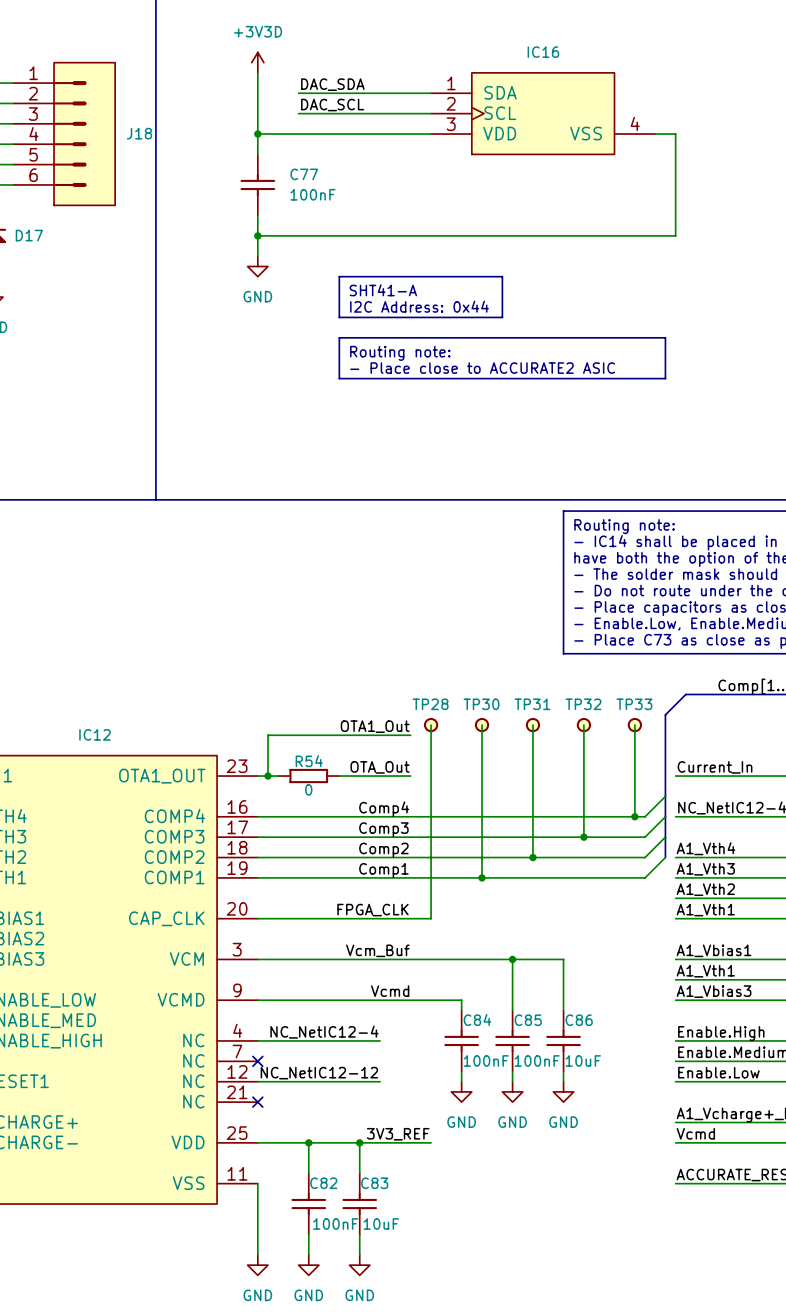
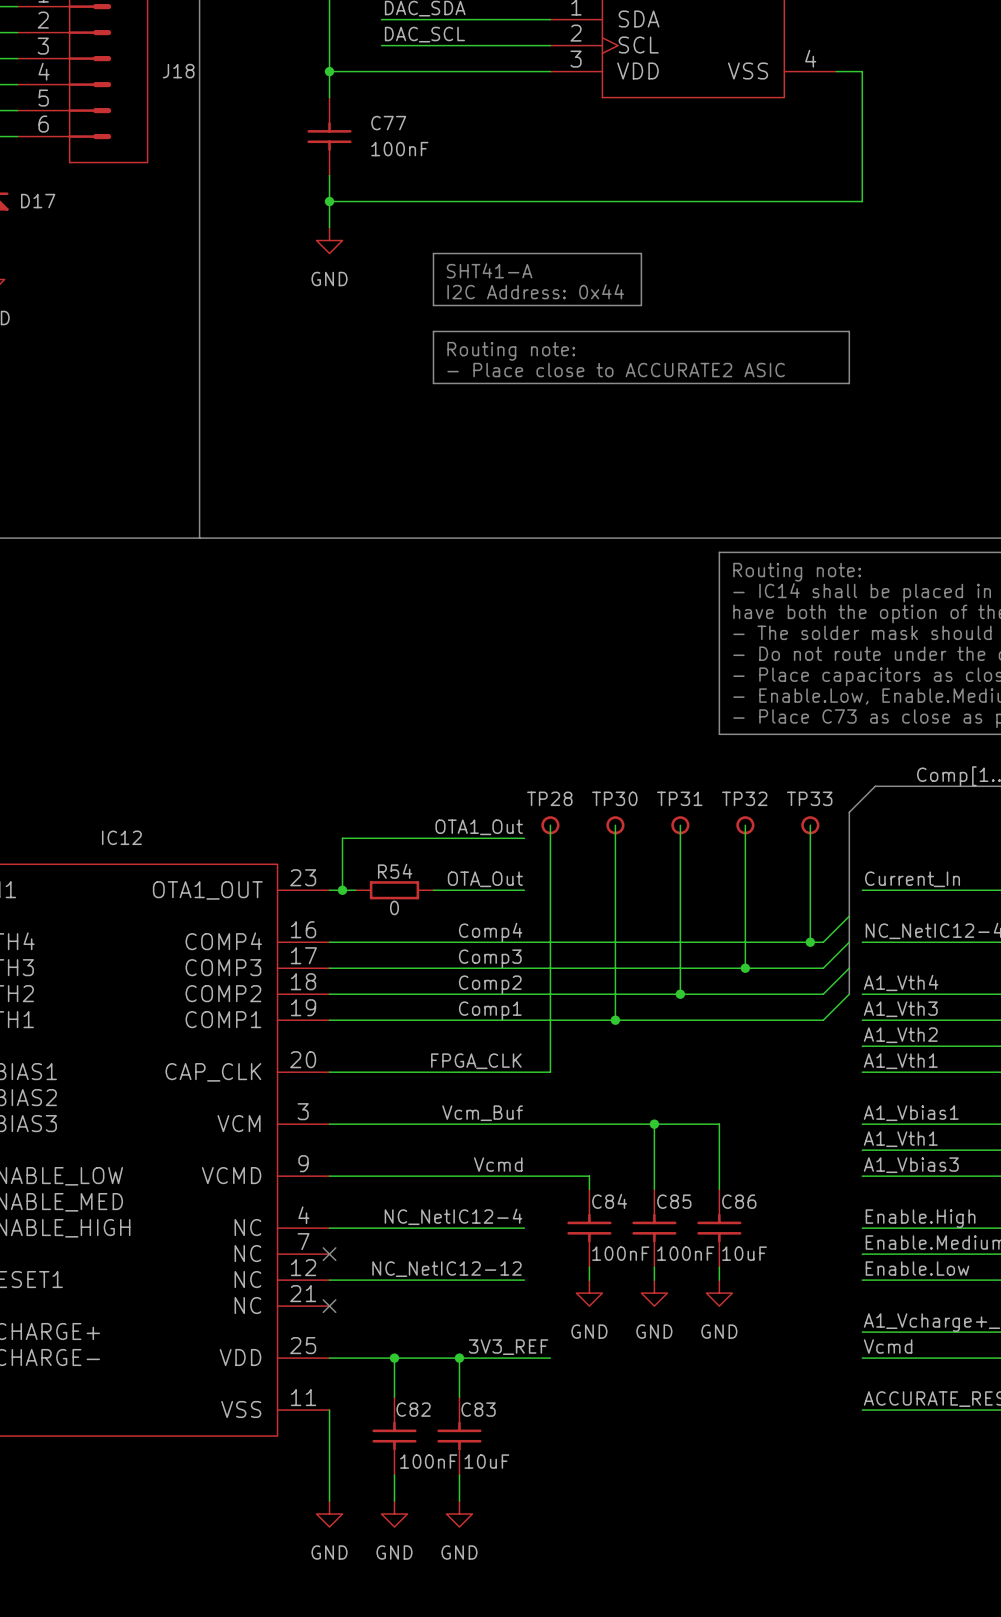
label position: NC_NetIC12-4 (324, 1032) -> NC_NetIC12-4 (453, 1216)
wire: none -> (485, 1228) (524, 1228)
label position: NC_NetIC12-12 (319, 1073) -> NC_NetIC12-12 (446, 1269)
wire: none -> (485, 1280) (524, 1280)

